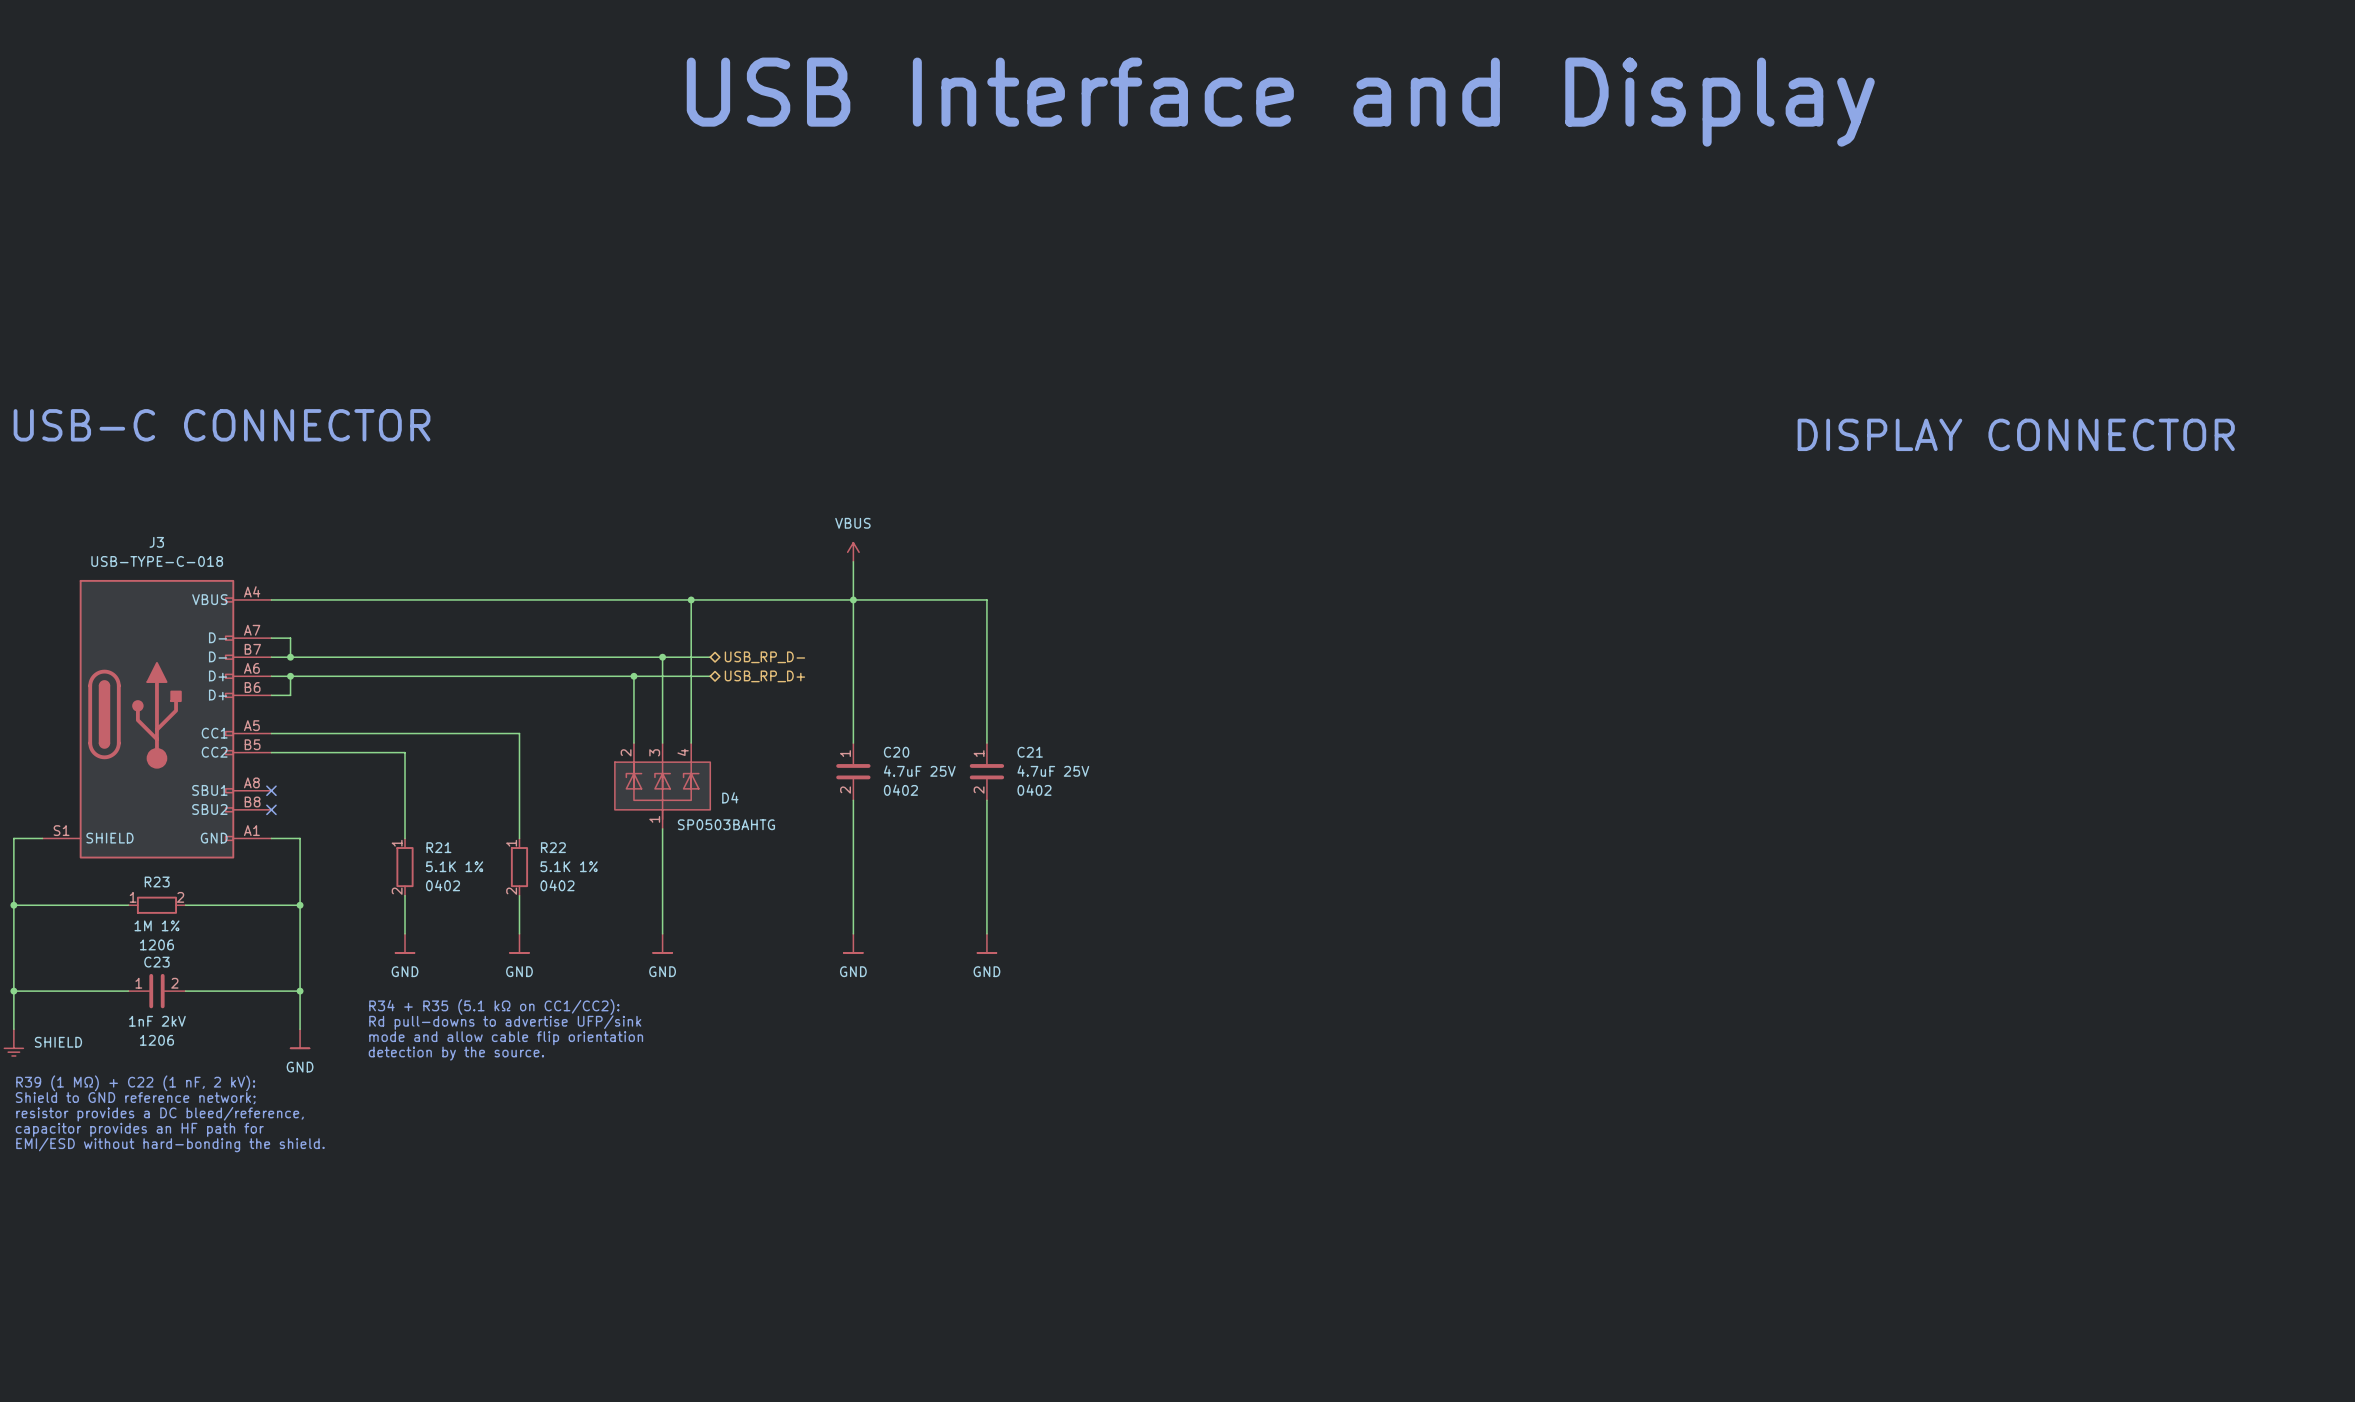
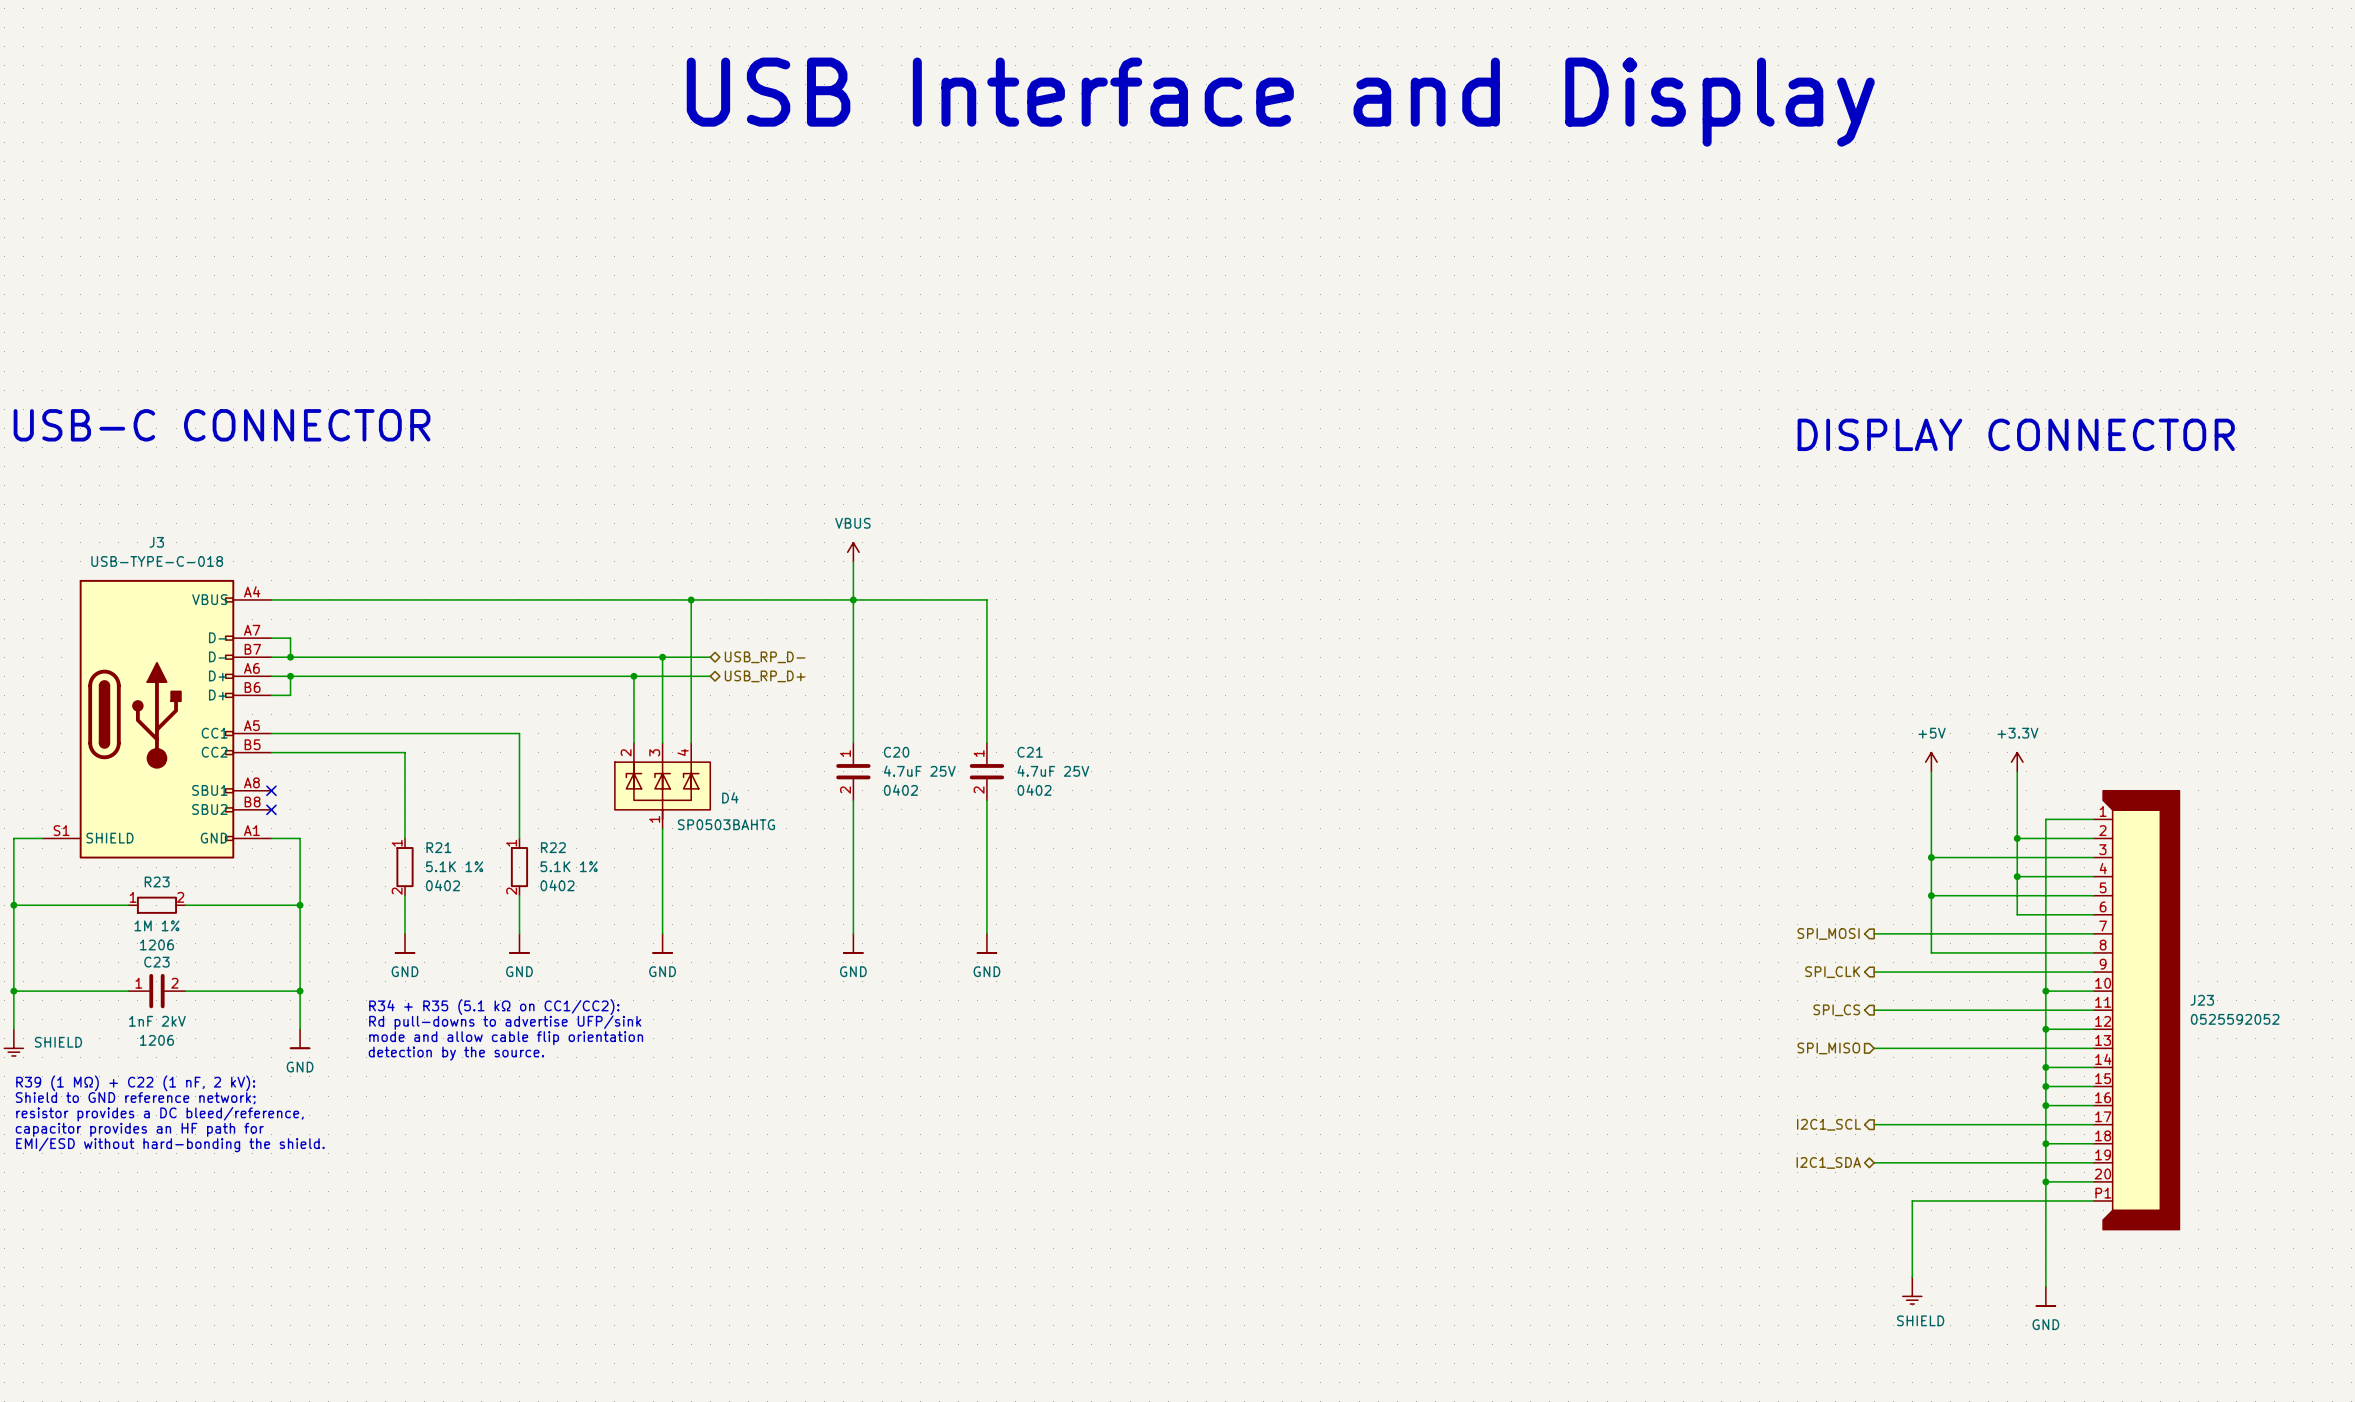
power symbol: none -> +5V (1931, 762)
power symbol: none -> +3.3V (2017, 762)
wire: none -> (1931, 771) (1931, 952) (2093, 952)
wire: none -> (2017, 771) (2017, 914) (2093, 914)
wire: none -> (2093, 819) (2045, 819) (2045, 1286)
wire: none -> (2017, 838) (2093, 838)
junction: none -> (2017, 838)
wire: none -> (1931, 857) (2093, 857)
junction: none -> (1931, 857)
wire: none -> (2017, 876) (2093, 876)
junction: none -> (2017, 876)
wire: none -> (1931, 895) (2093, 895)
junction: none -> (1931, 895)
hierarchical label: none -> SPI_MOSI (1828, 933)
wire: none -> (1874, 933) (2093, 933)
hierarchical label: none -> SPI_CLK (1832, 972)
wire: none -> (1874, 972) (2093, 972)
wire: none -> (2045, 991) (2093, 991)
junction: none -> (2045, 991)
hierarchical label: none -> SPI_CS (1836, 1010)
wire: none -> (1874, 1010) (2093, 1010)
J23: none -> 0525592052 (2136, 1010)
wire: none -> (2045, 1029) (2093, 1029)
junction: none -> (2045, 1029)
hierarchical label: none -> SPI_MISO (1828, 1048)
wire: none -> (1874, 1048) (2093, 1048)
wire: none -> (2045, 1067) (2093, 1067)
junction: none -> (2045, 1067)
wire: none -> (2045, 1086) (2093, 1086)
junction: none -> (2045, 1086)
wire: none -> (2045, 1105) (2093, 1105)
junction: none -> (2045, 1105)
hierarchical label: none -> I2C1_SCL (1829, 1124)
wire: none -> (1874, 1124) (2093, 1124)
wire: none -> (2045, 1143) (2093, 1143)
junction: none -> (2045, 1143)
hierarchical label: none -> I2C1_SDA (1828, 1162)
wire: none -> (1874, 1162) (2093, 1162)
wire: none -> (2045, 1181) (2093, 1181)
junction: none -> (2045, 1181)
wire: none -> (2093, 1200) (1912, 1200) (1912, 1277)
power symbol: none -> SHIELD (1912, 1290)
power symbol: none -> GND (2045, 1296)

